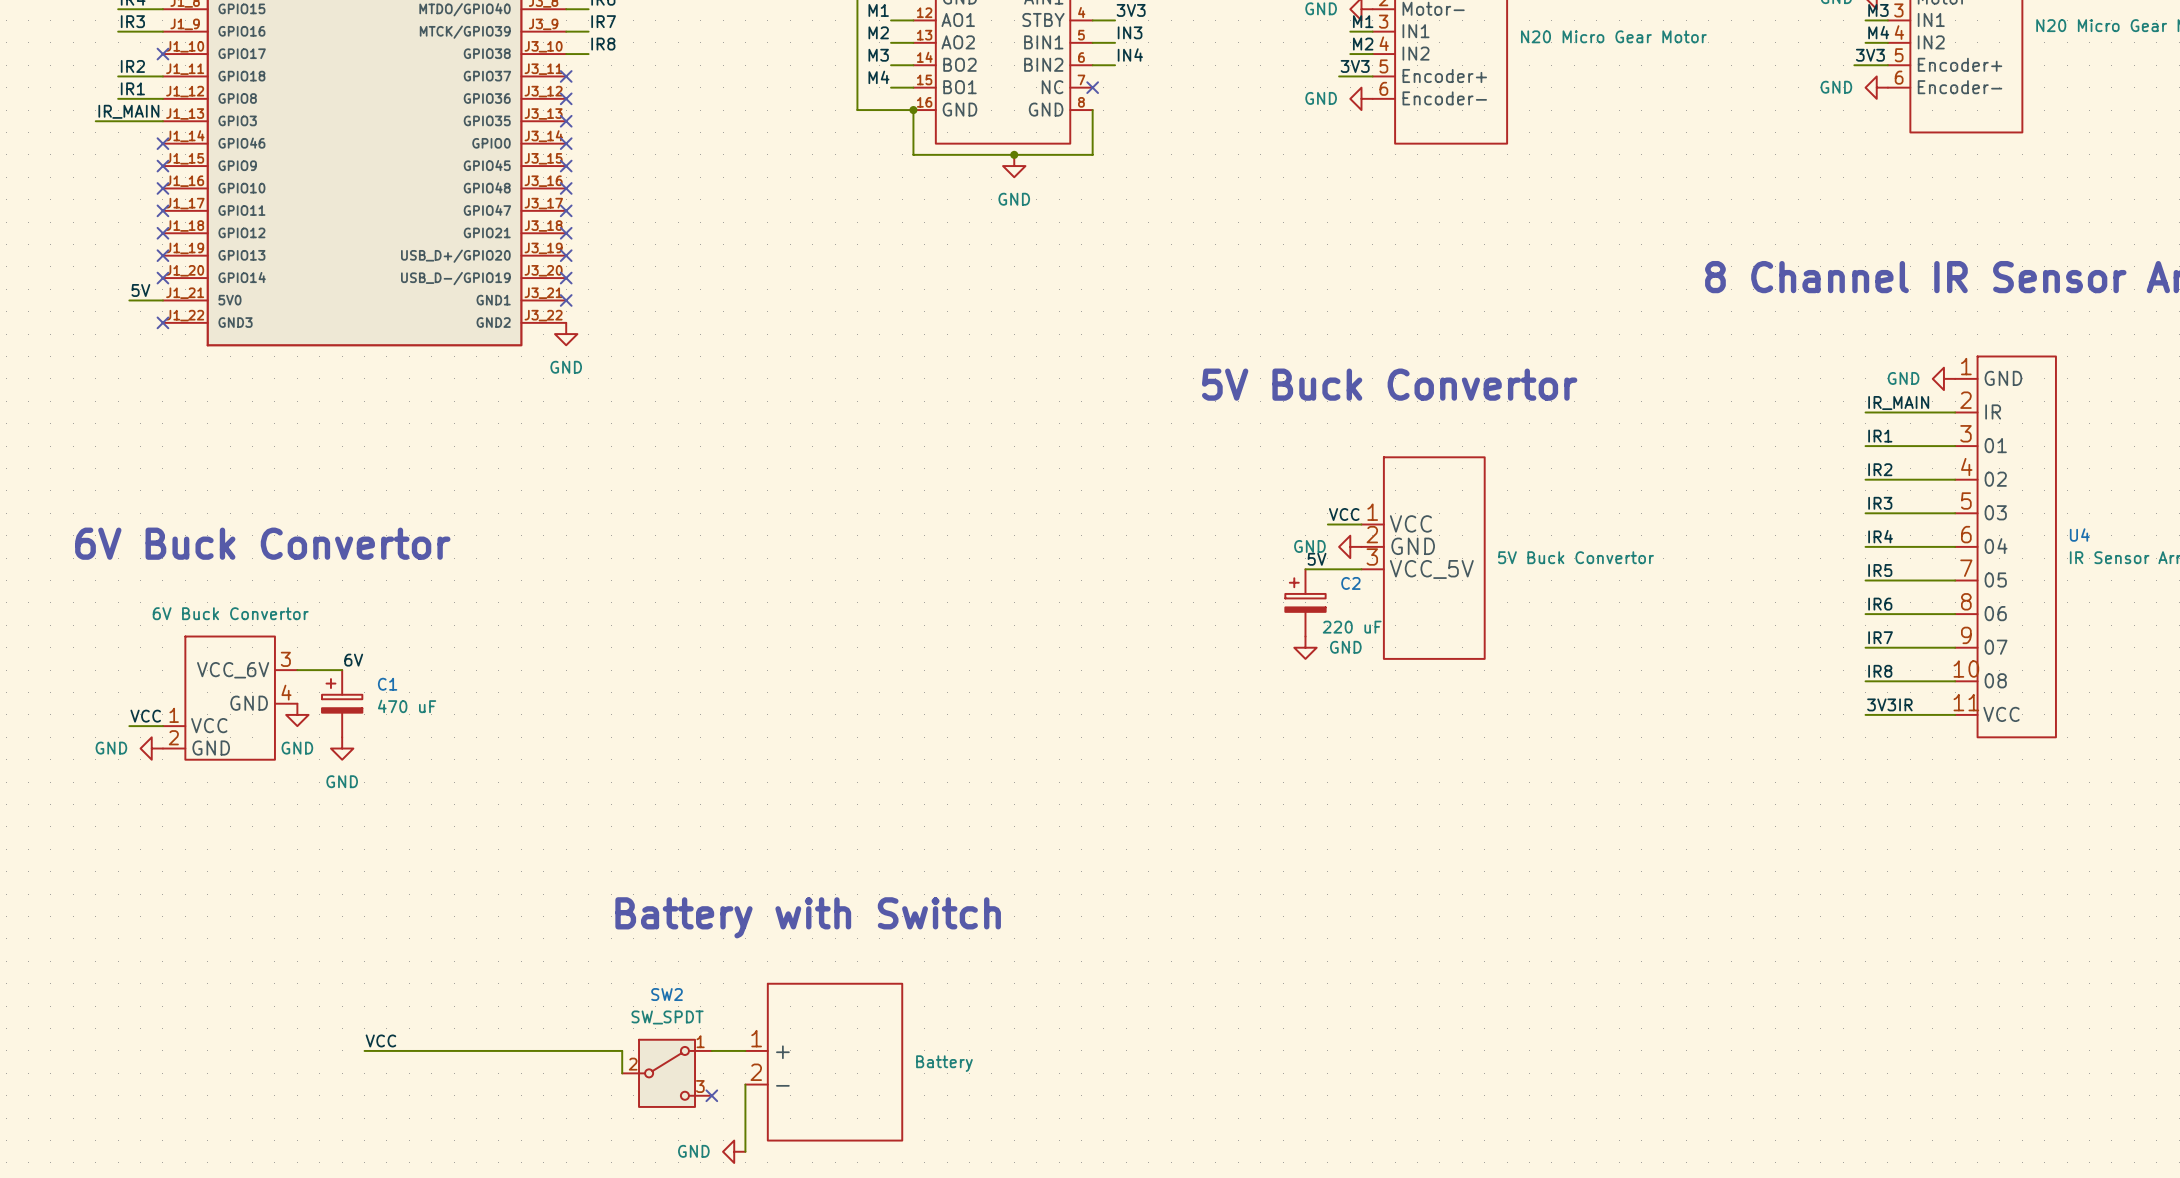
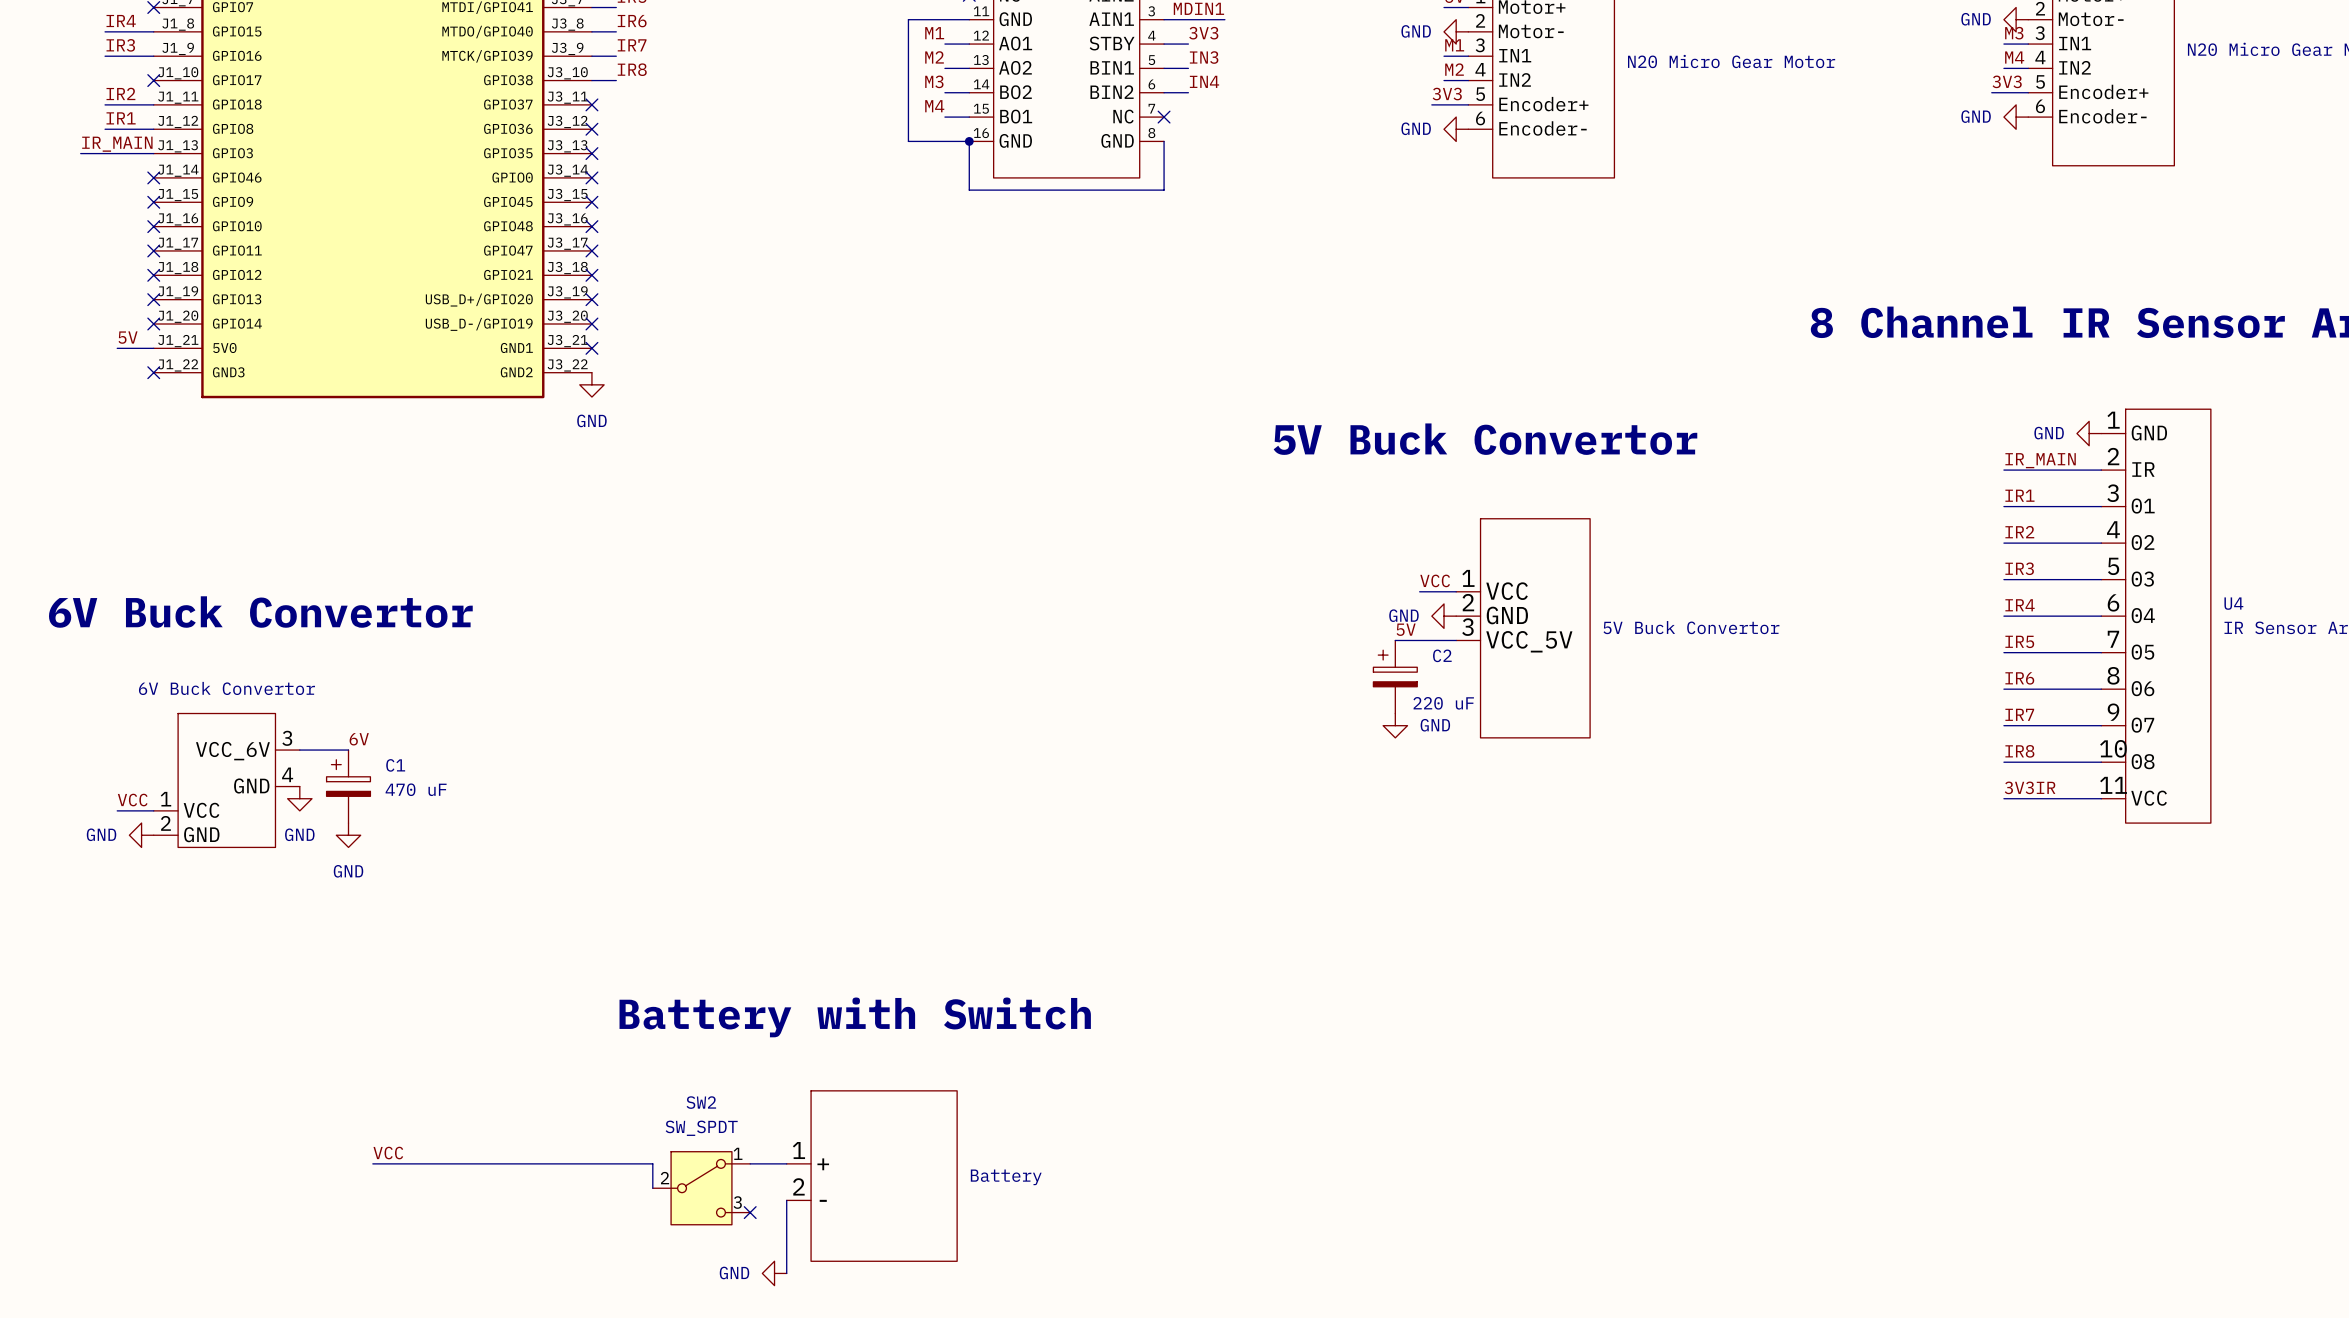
junction: (1014, 154) -> none
power symbol: GND (1014, 166) -> none

